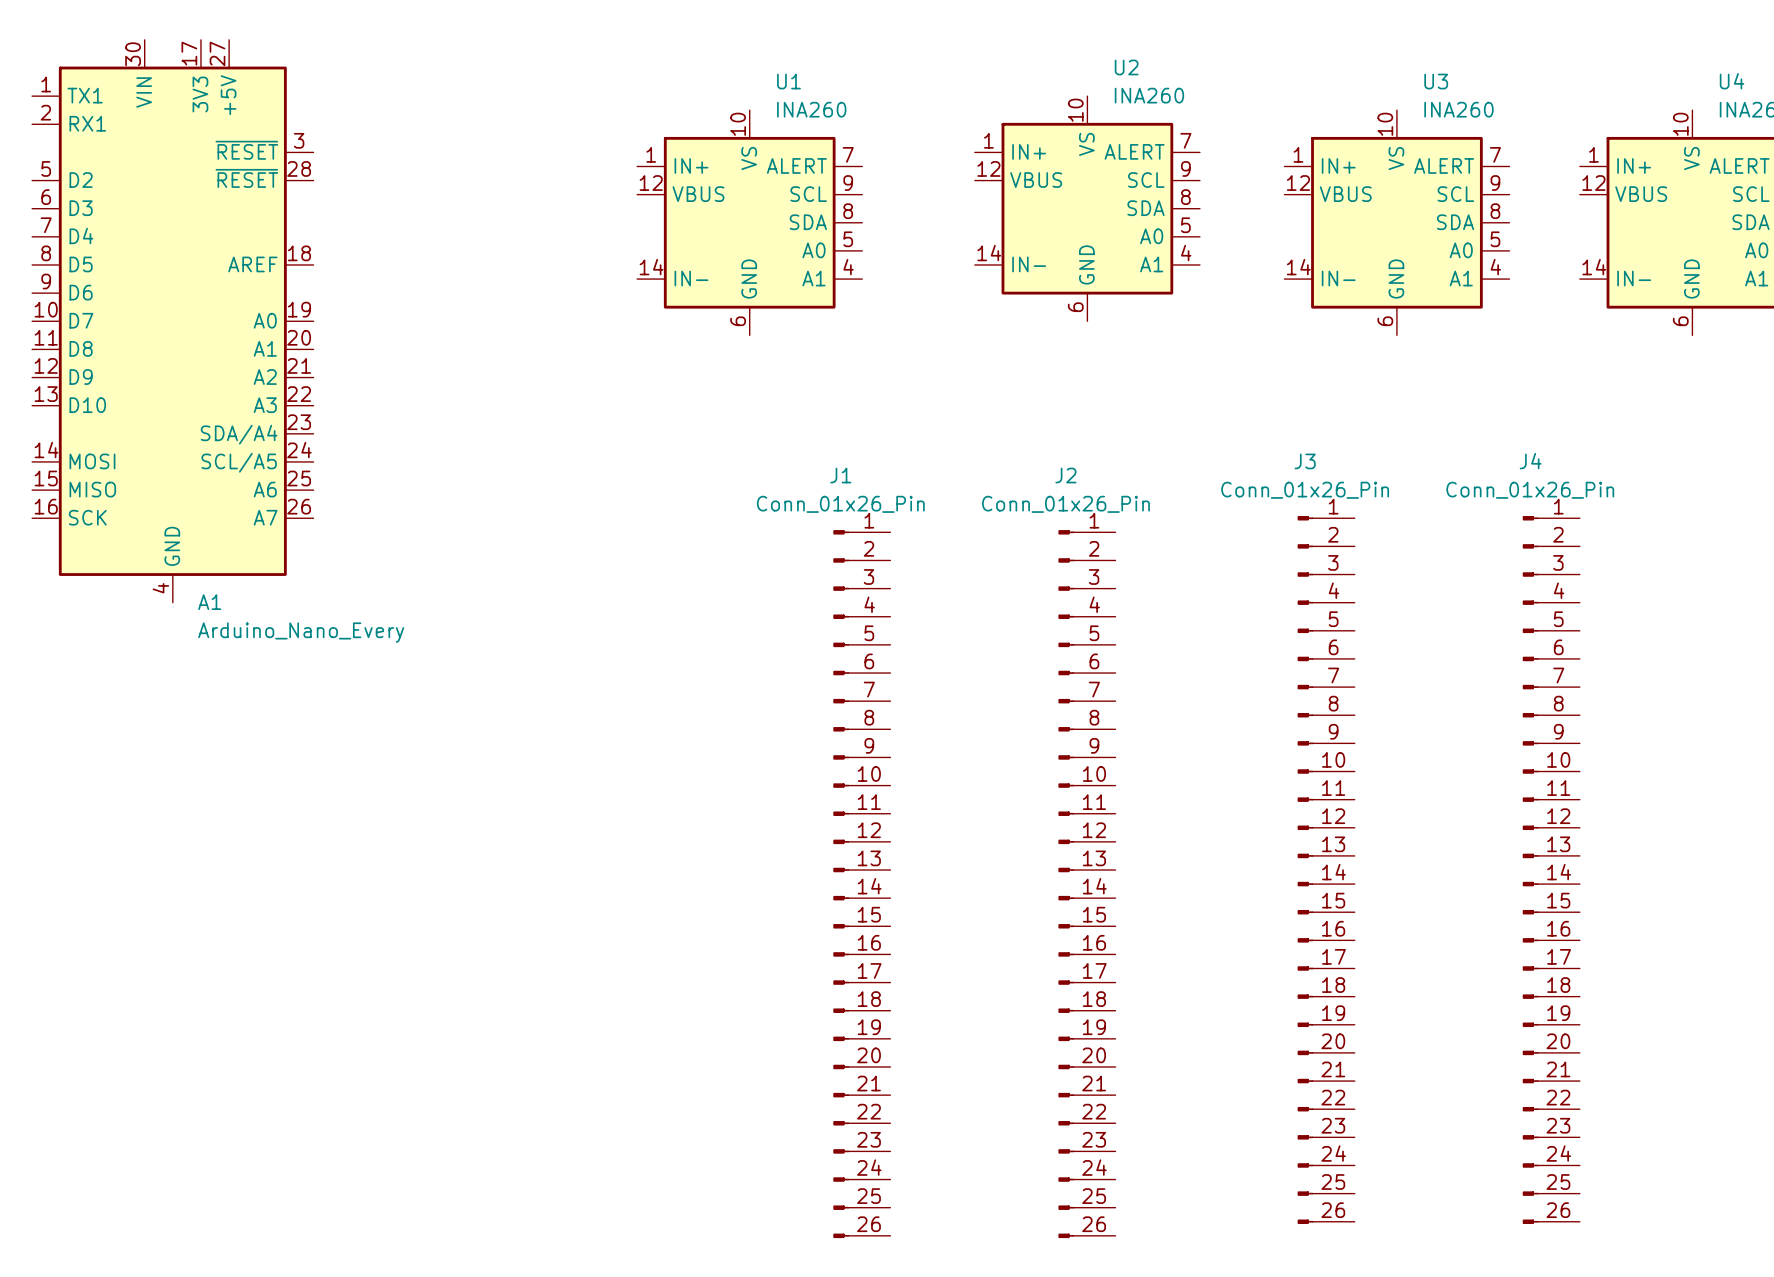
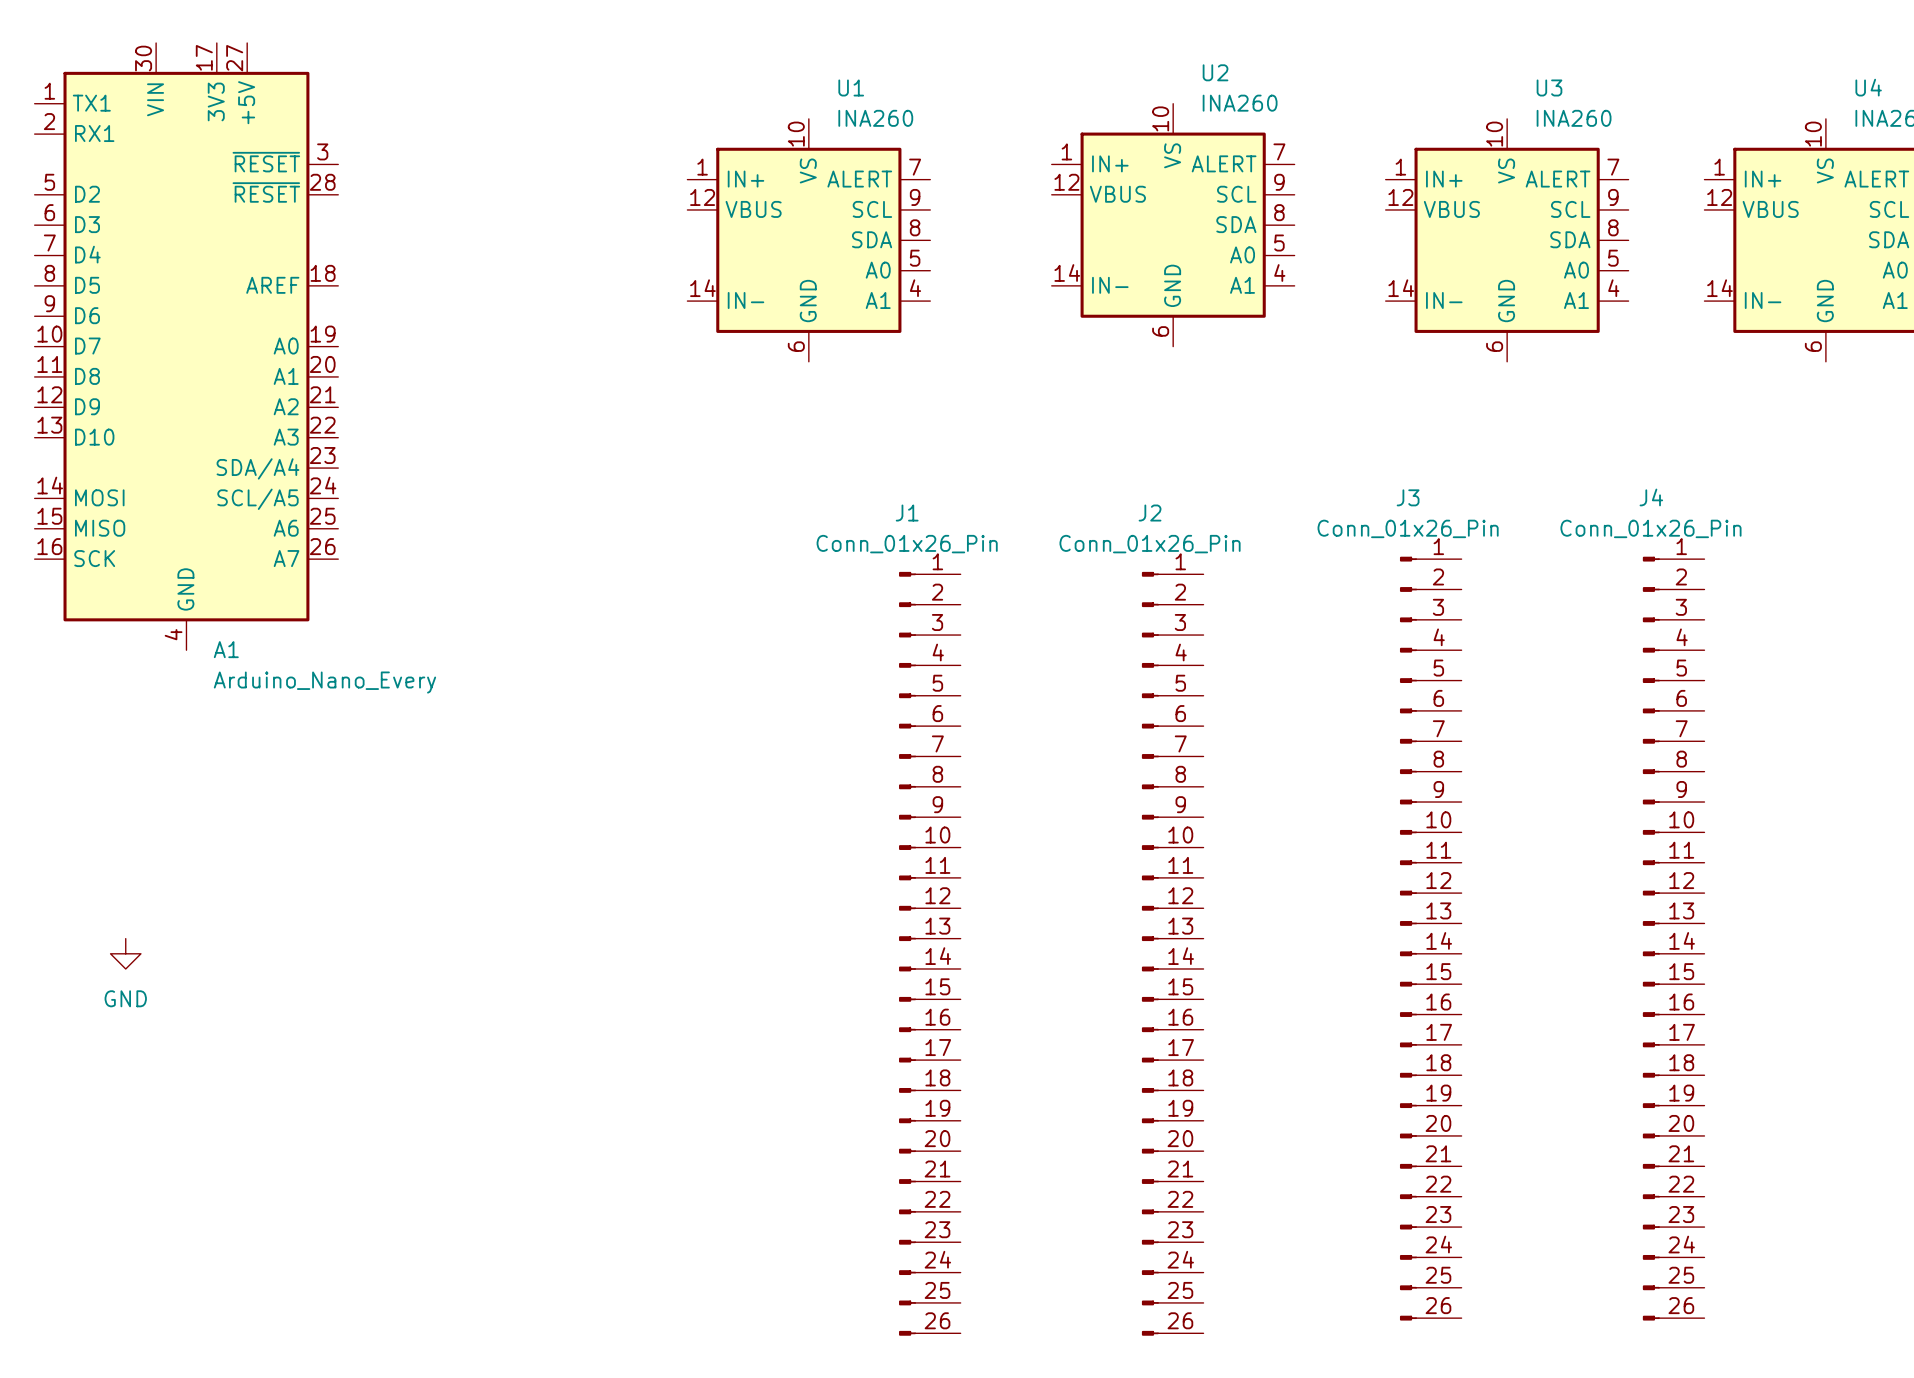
power symbol: none -> GND (125, 953)

